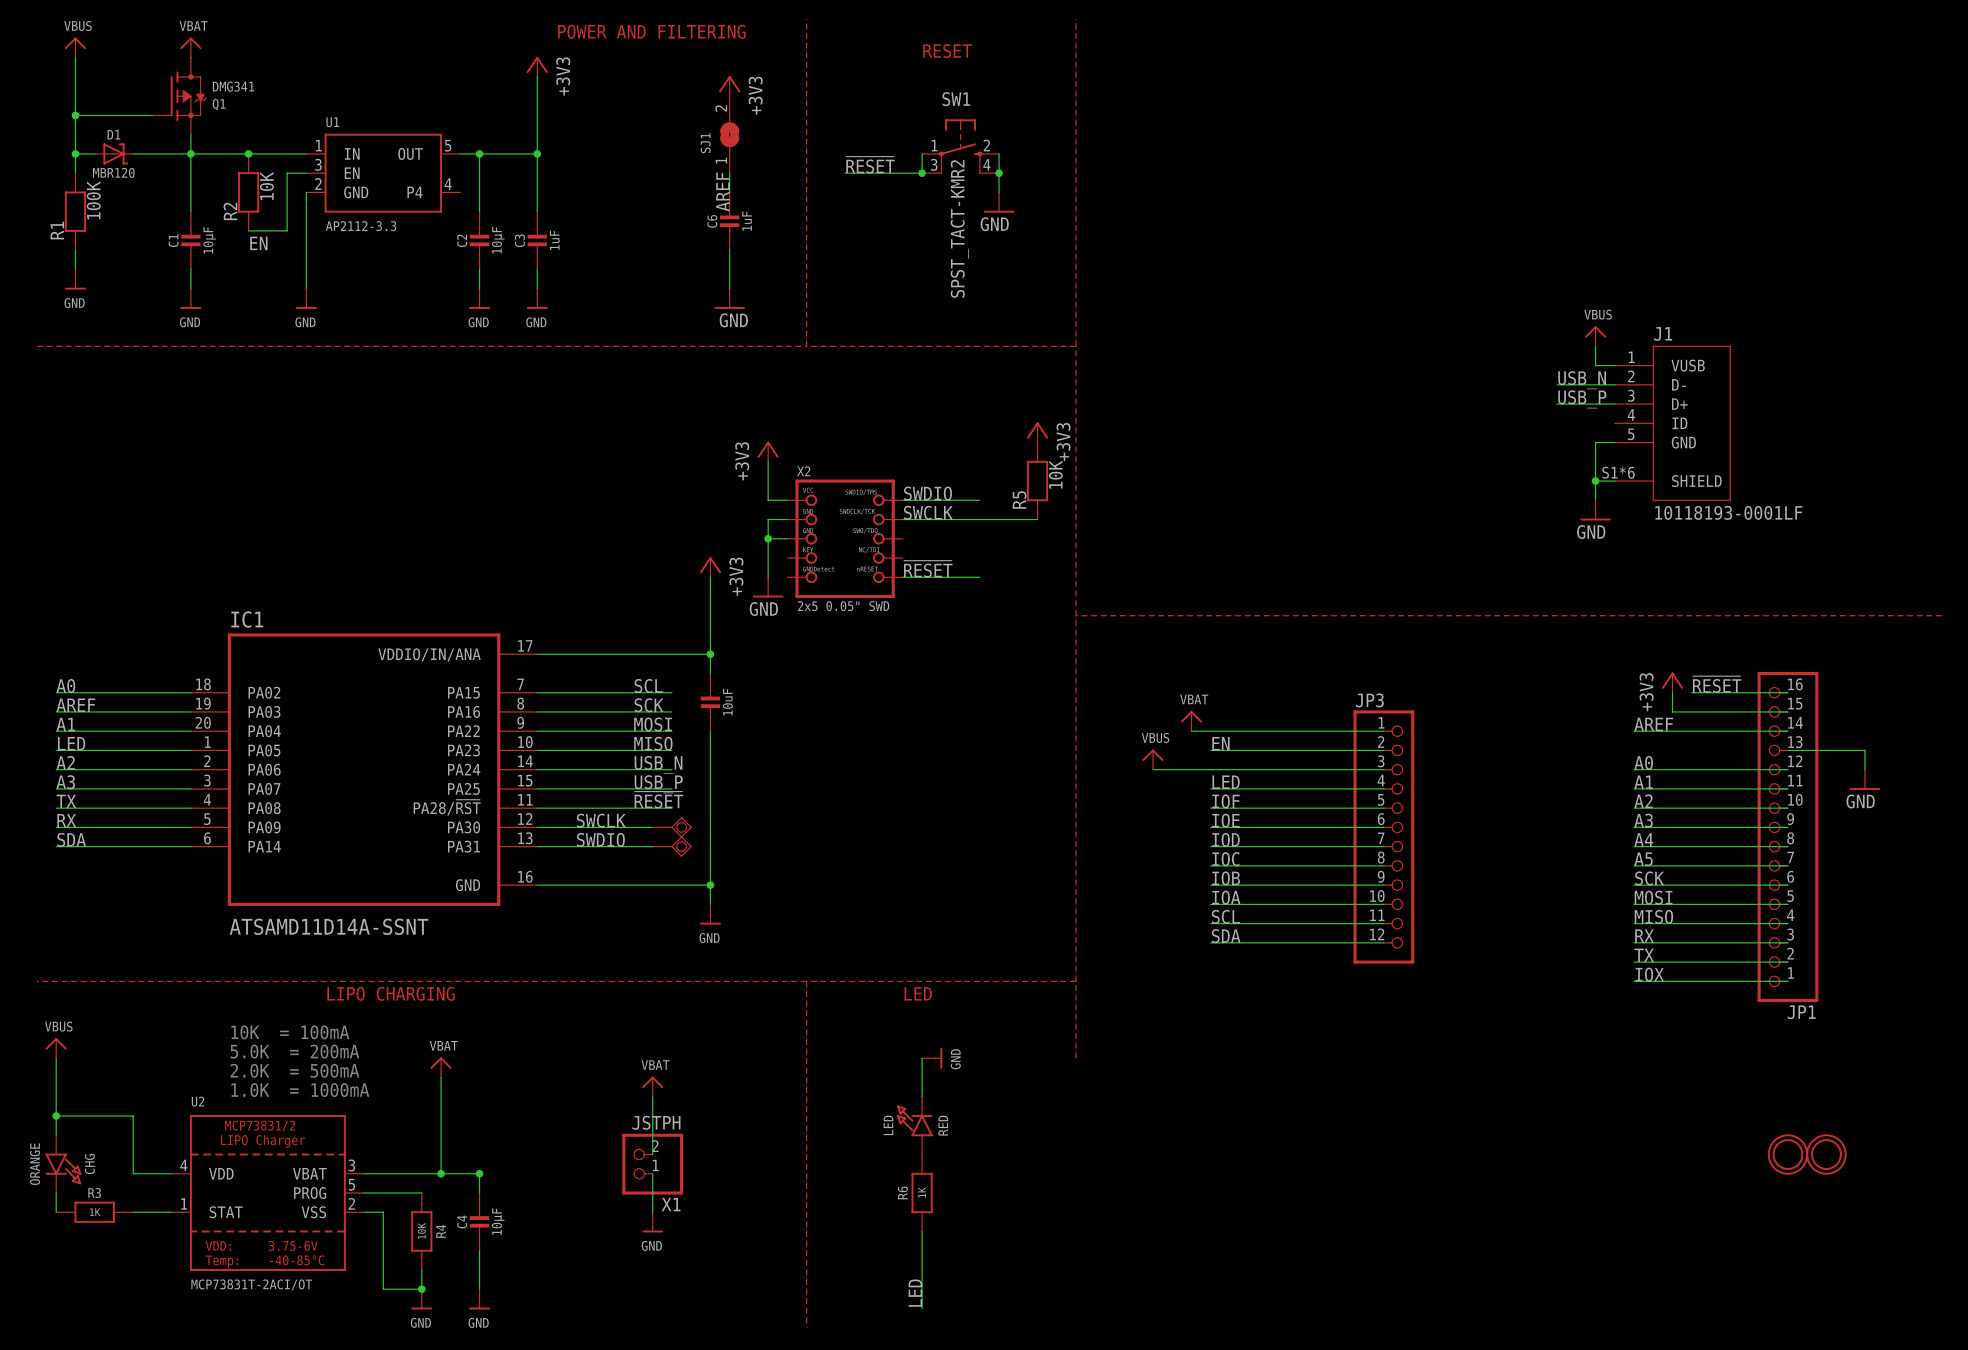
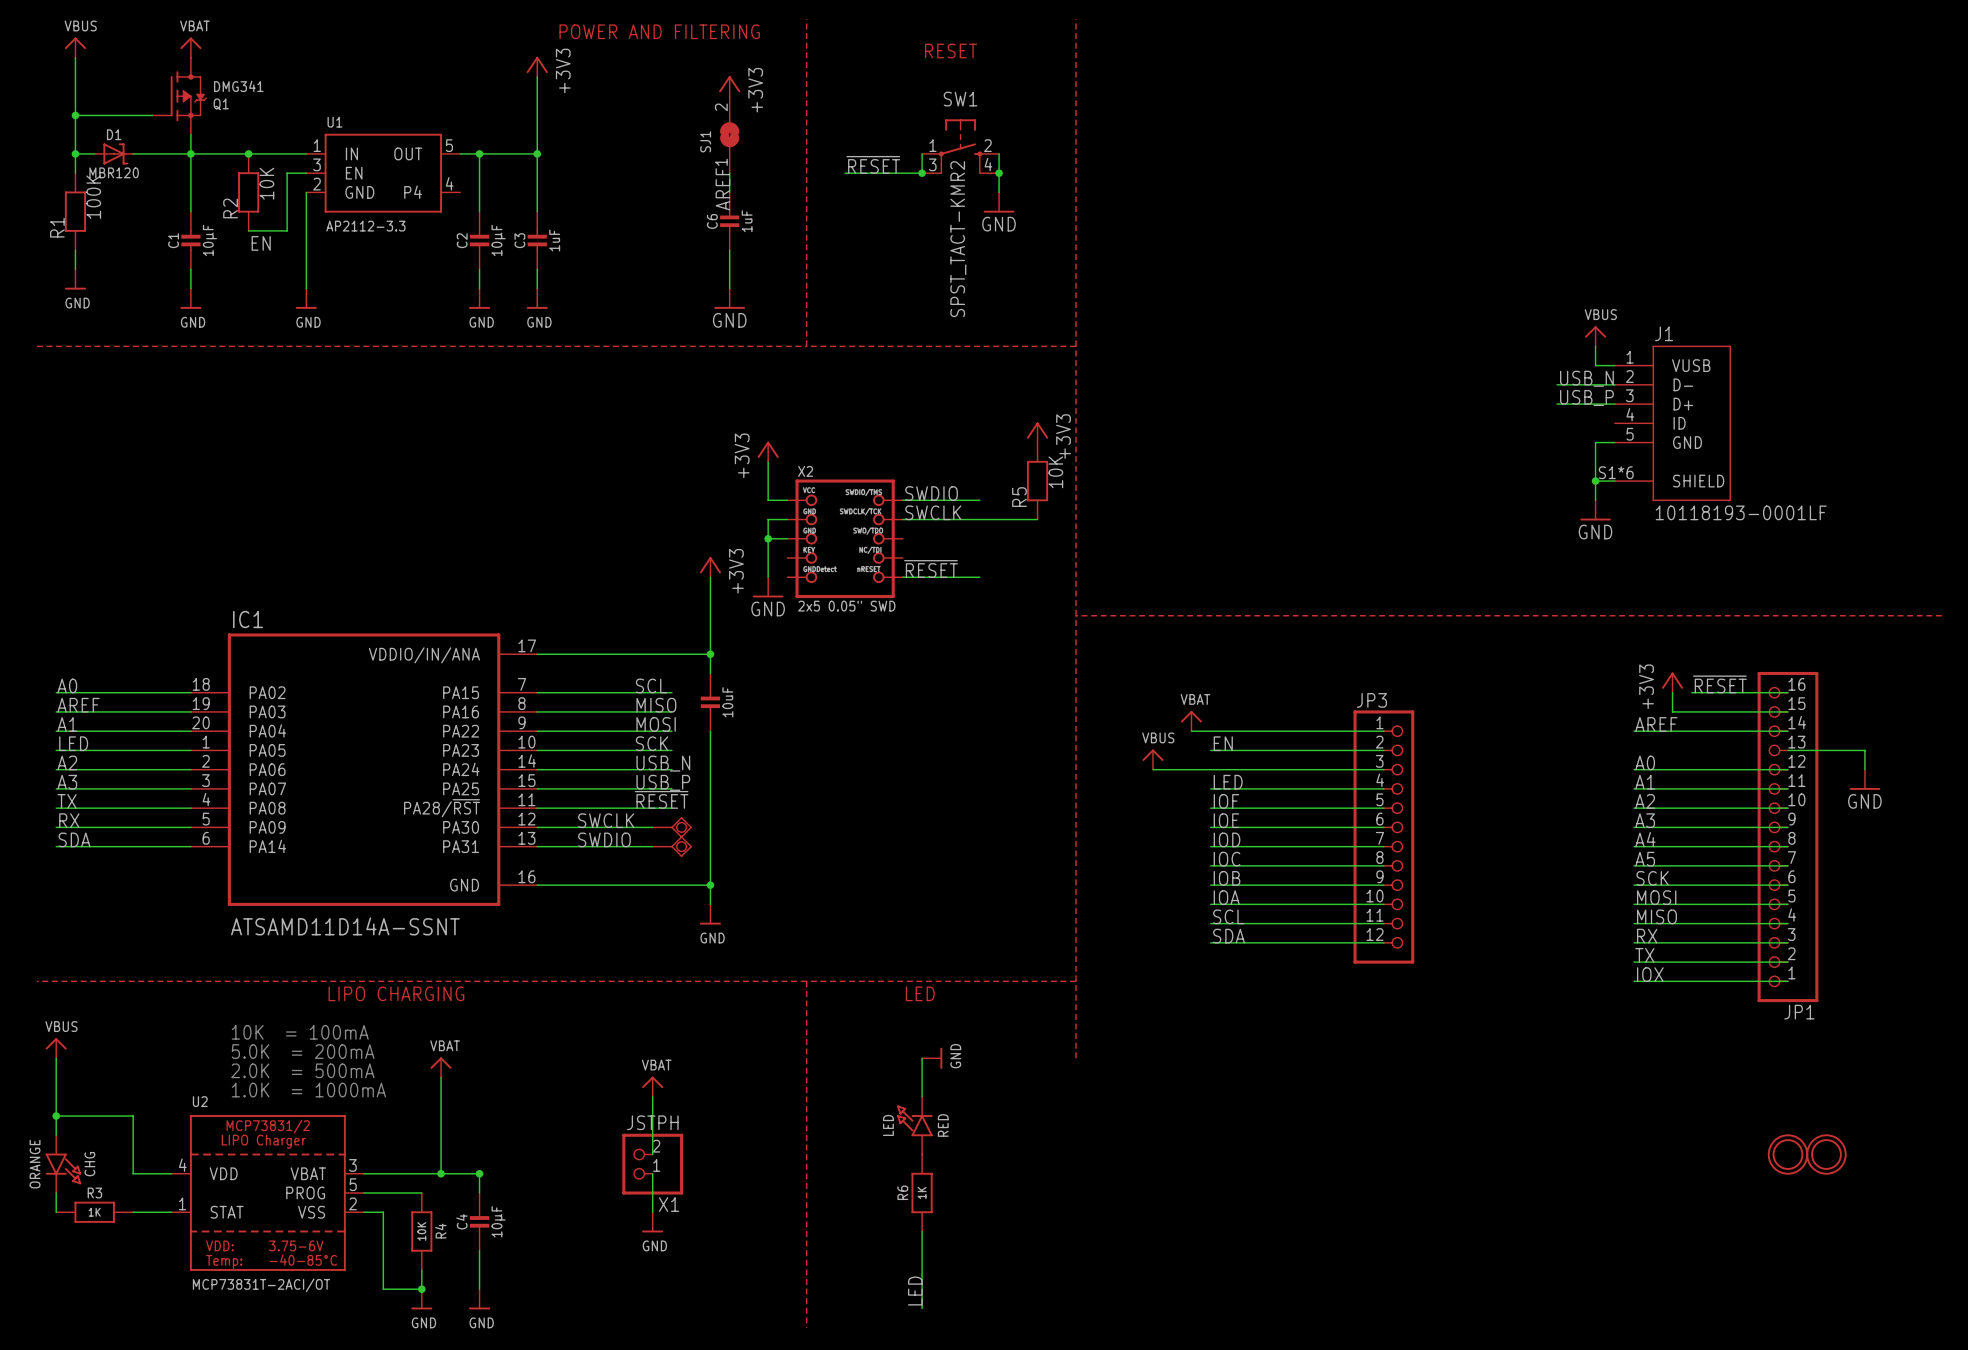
label: SCK (649, 705) -> MISO (656, 705)
label: MISO (653, 743) -> SCK (652, 743)

